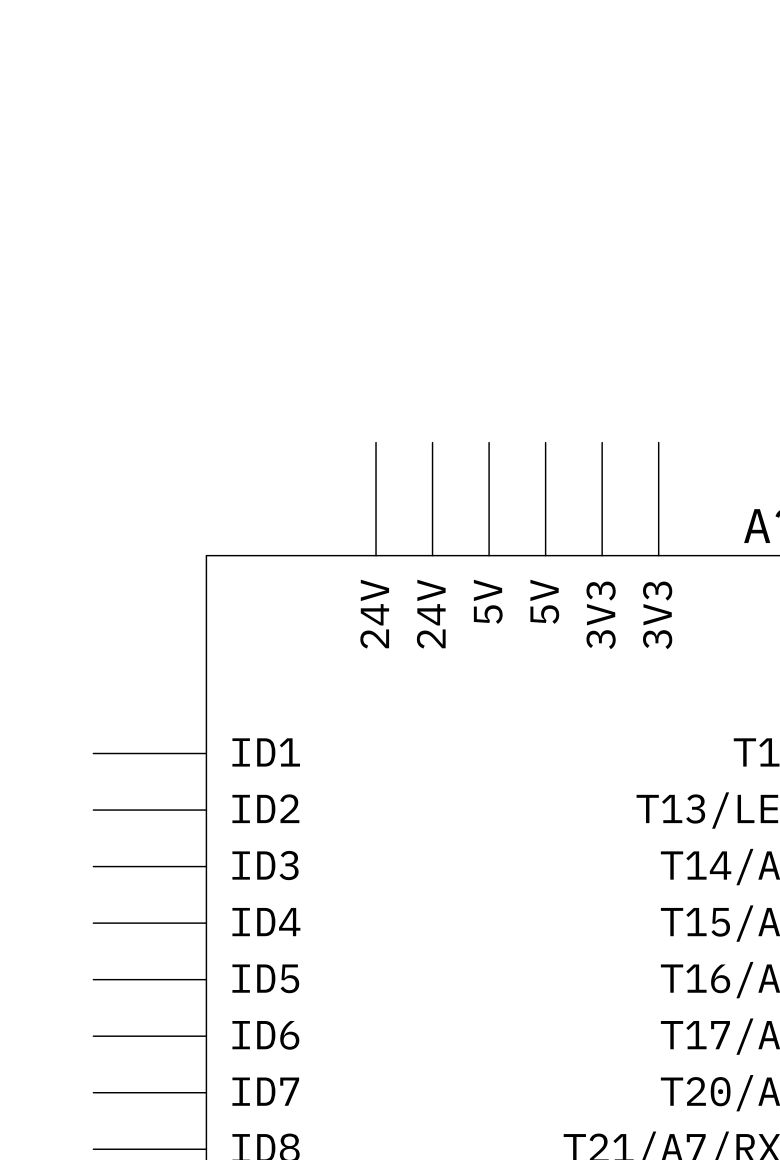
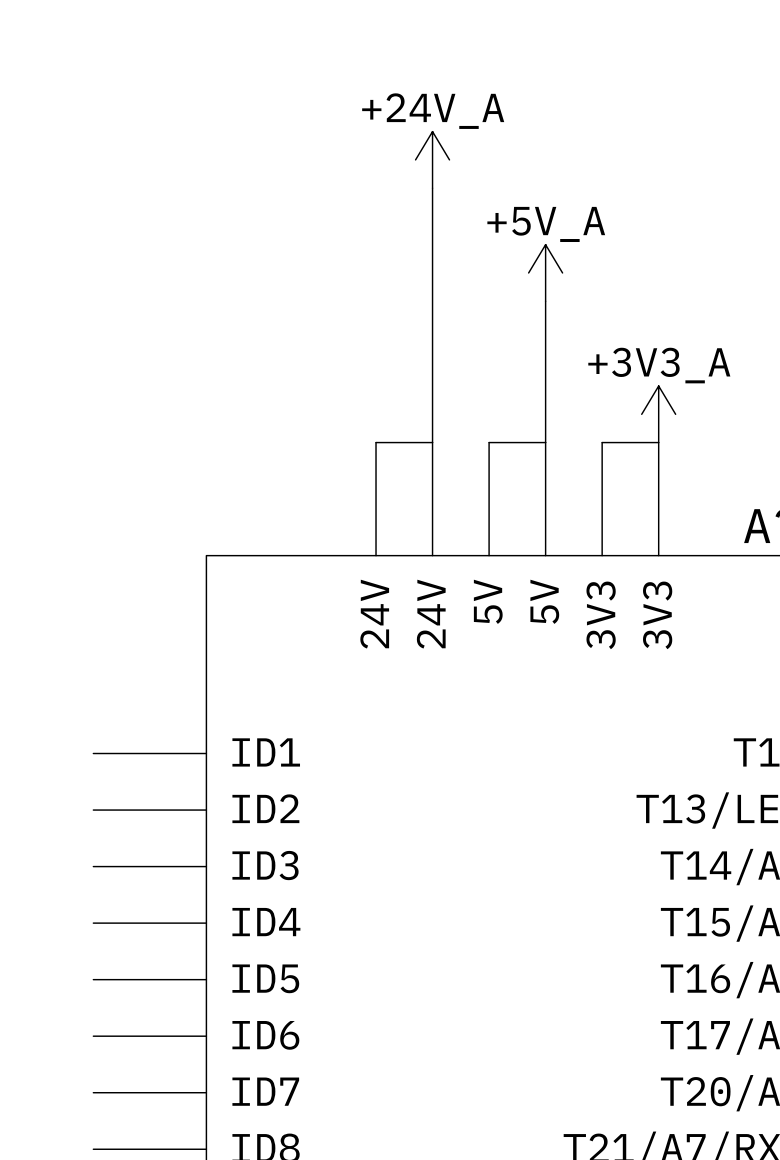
power symbol: none -> +24V_A (432, 159)
wire: none -> (432, 188) (432, 442) (376, 442)
power symbol: none -> +5V_A (545, 272)
wire: none -> (545, 301) (545, 442) (489, 442)
power symbol: none -> +3V3_A (658, 414)
wire: none -> (602, 442) (658, 442)

